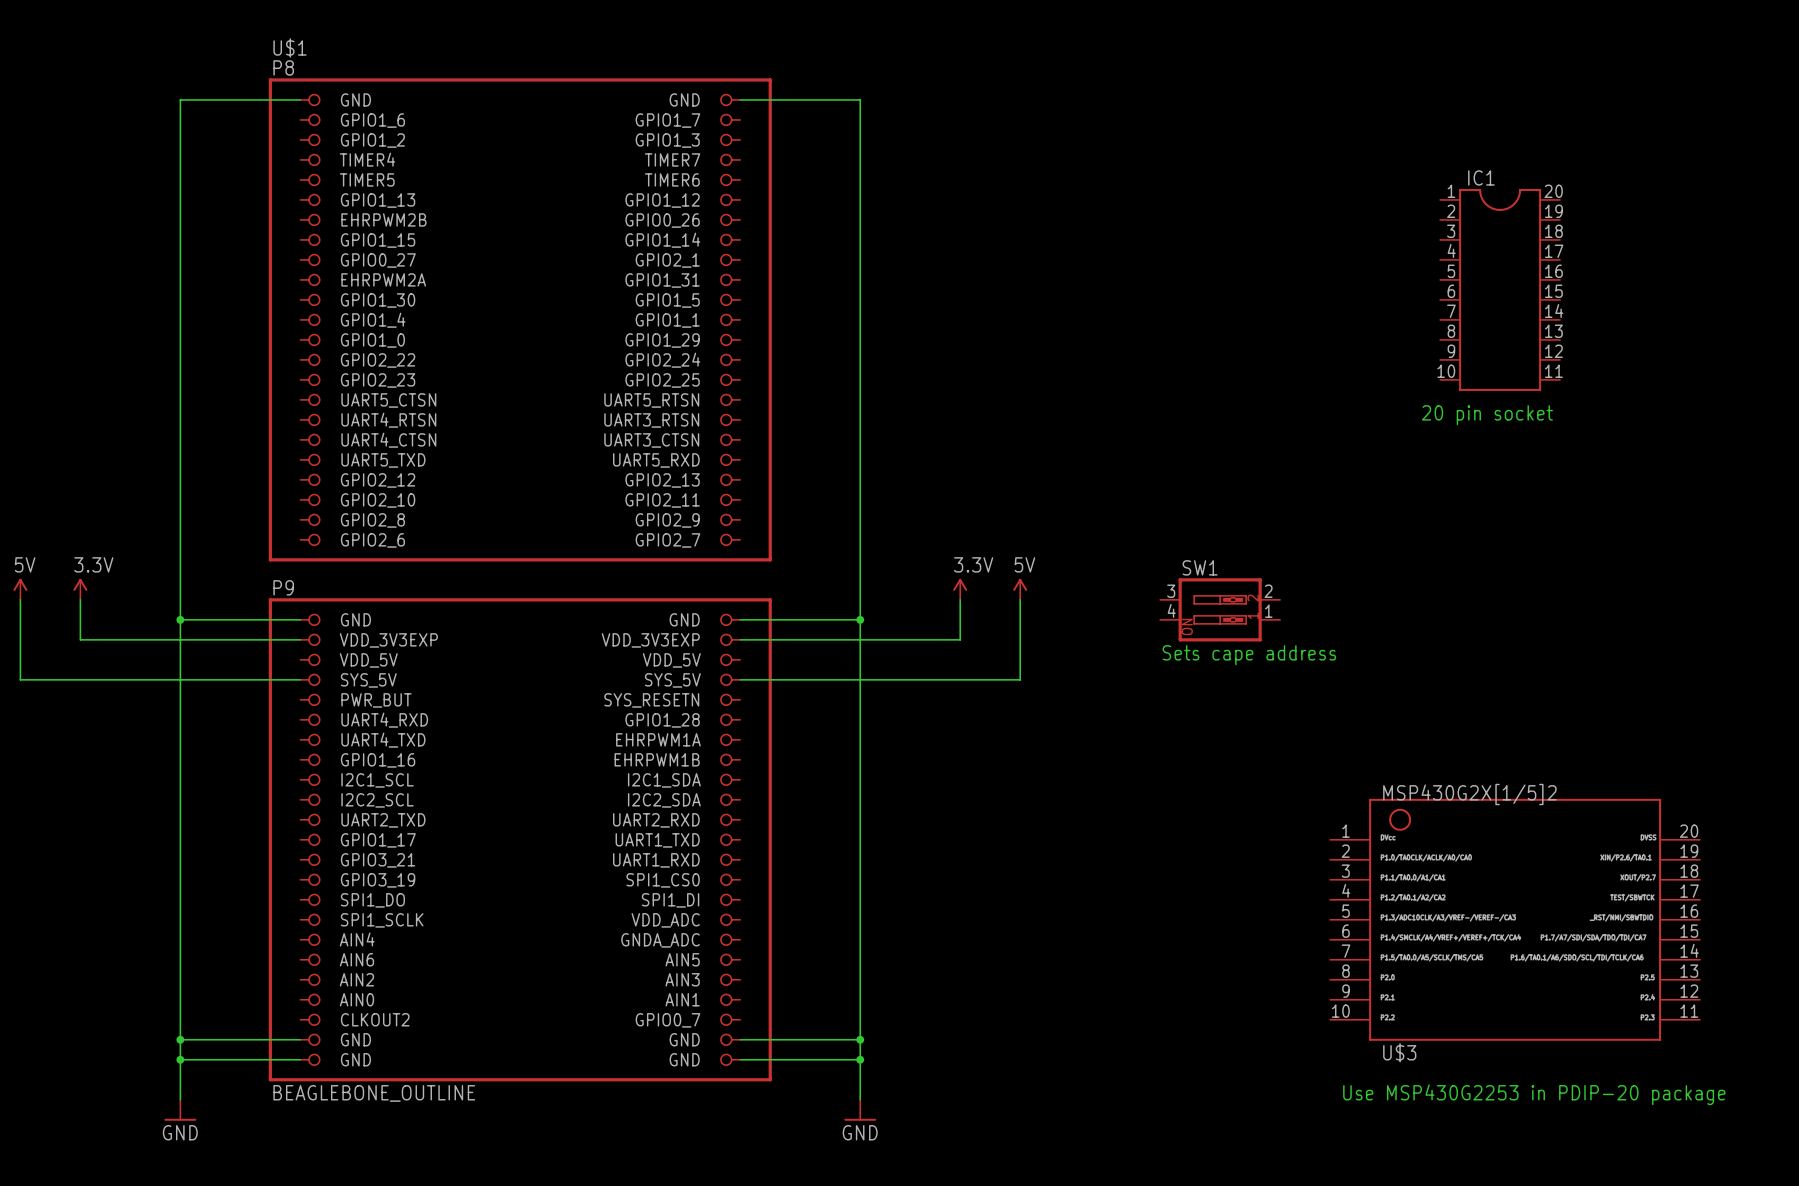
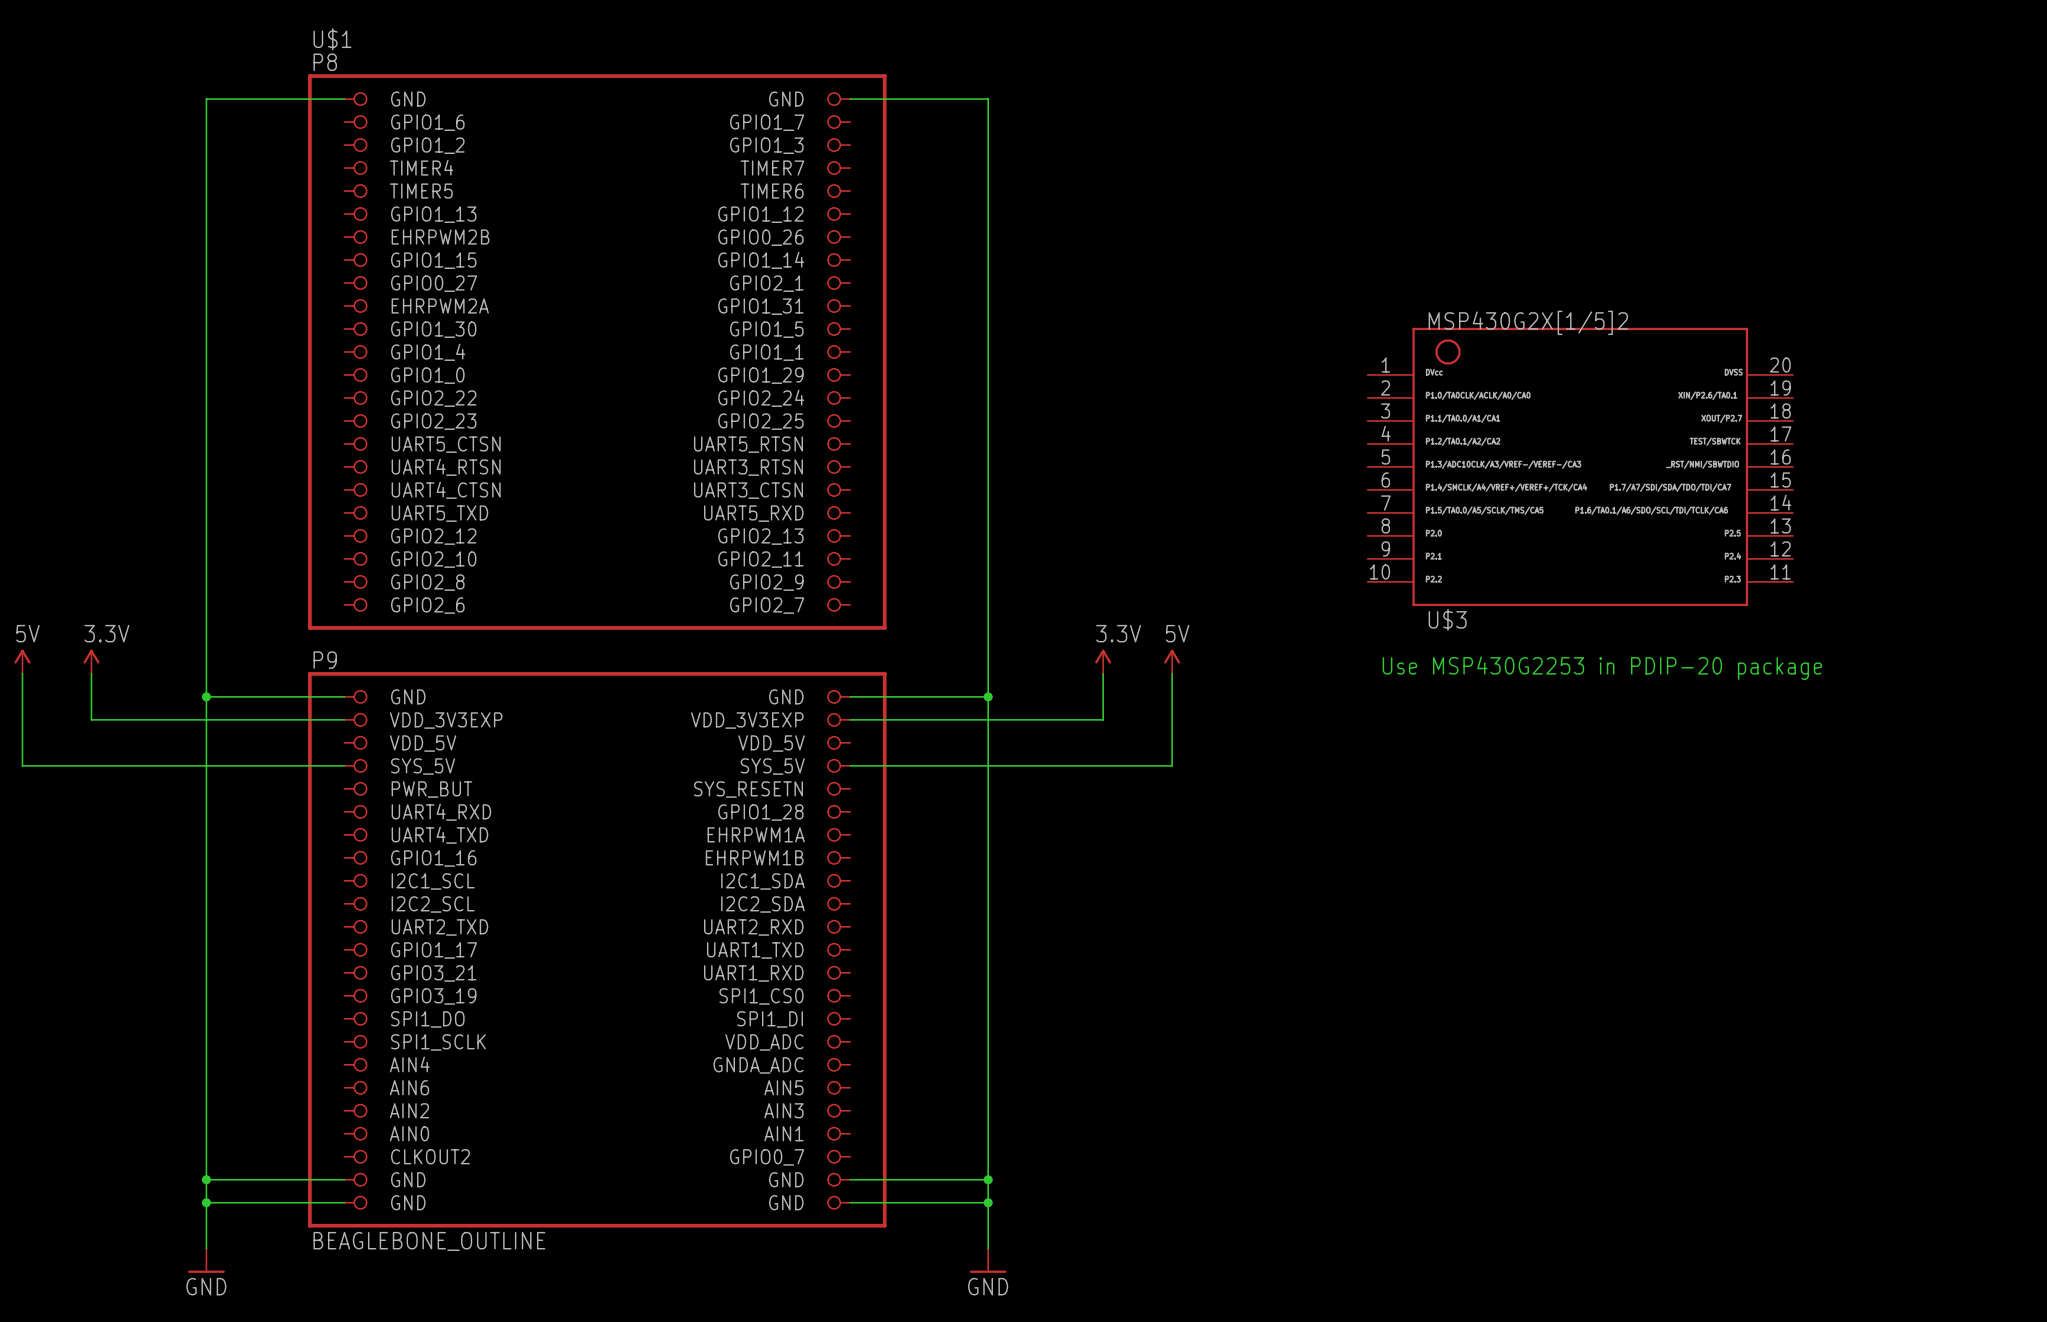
IC1: (1500, 289) -> none
text: 20 pin socket (1487, 415) -> none
text: none -> Use MSP430G2253 in PDIP-20 package (1602, 668)
SW1: (1220, 609) -> none
text: Sets cape address (1249, 655) -> none
U$3 position: (1515, 919) -> (1580, 466)
text: Use MSP430G2253 in PDIP-20 package (1534, 1094) -> none

